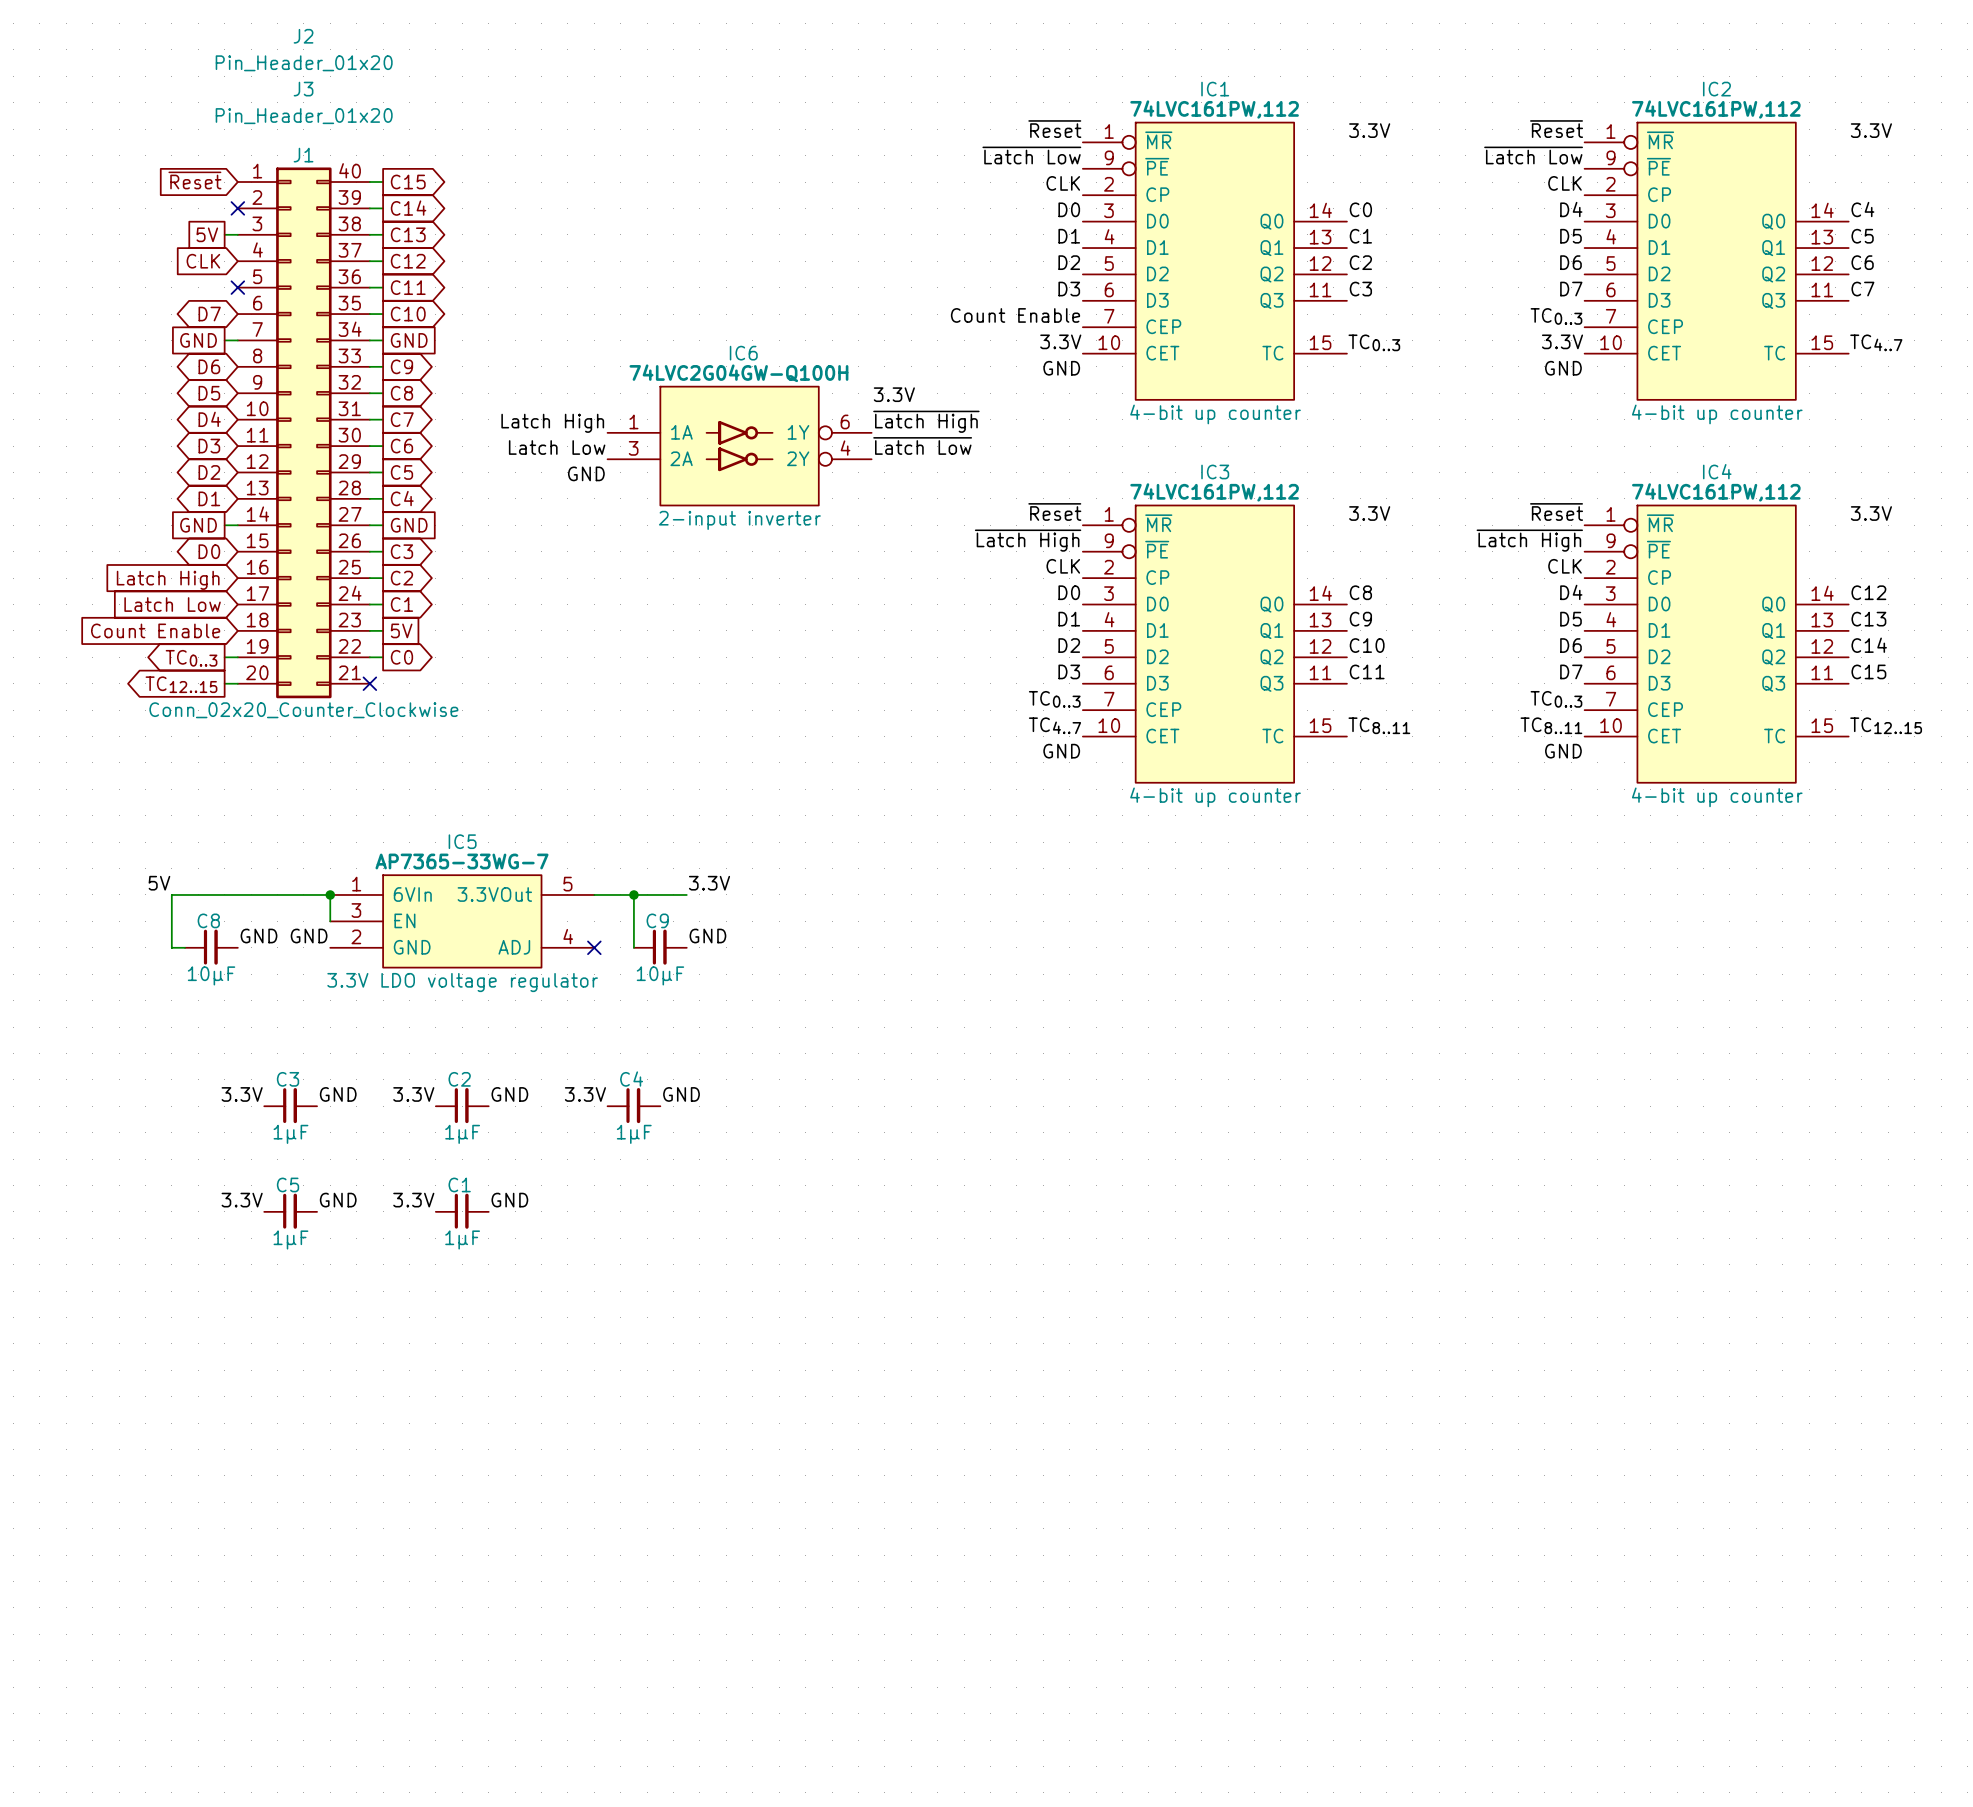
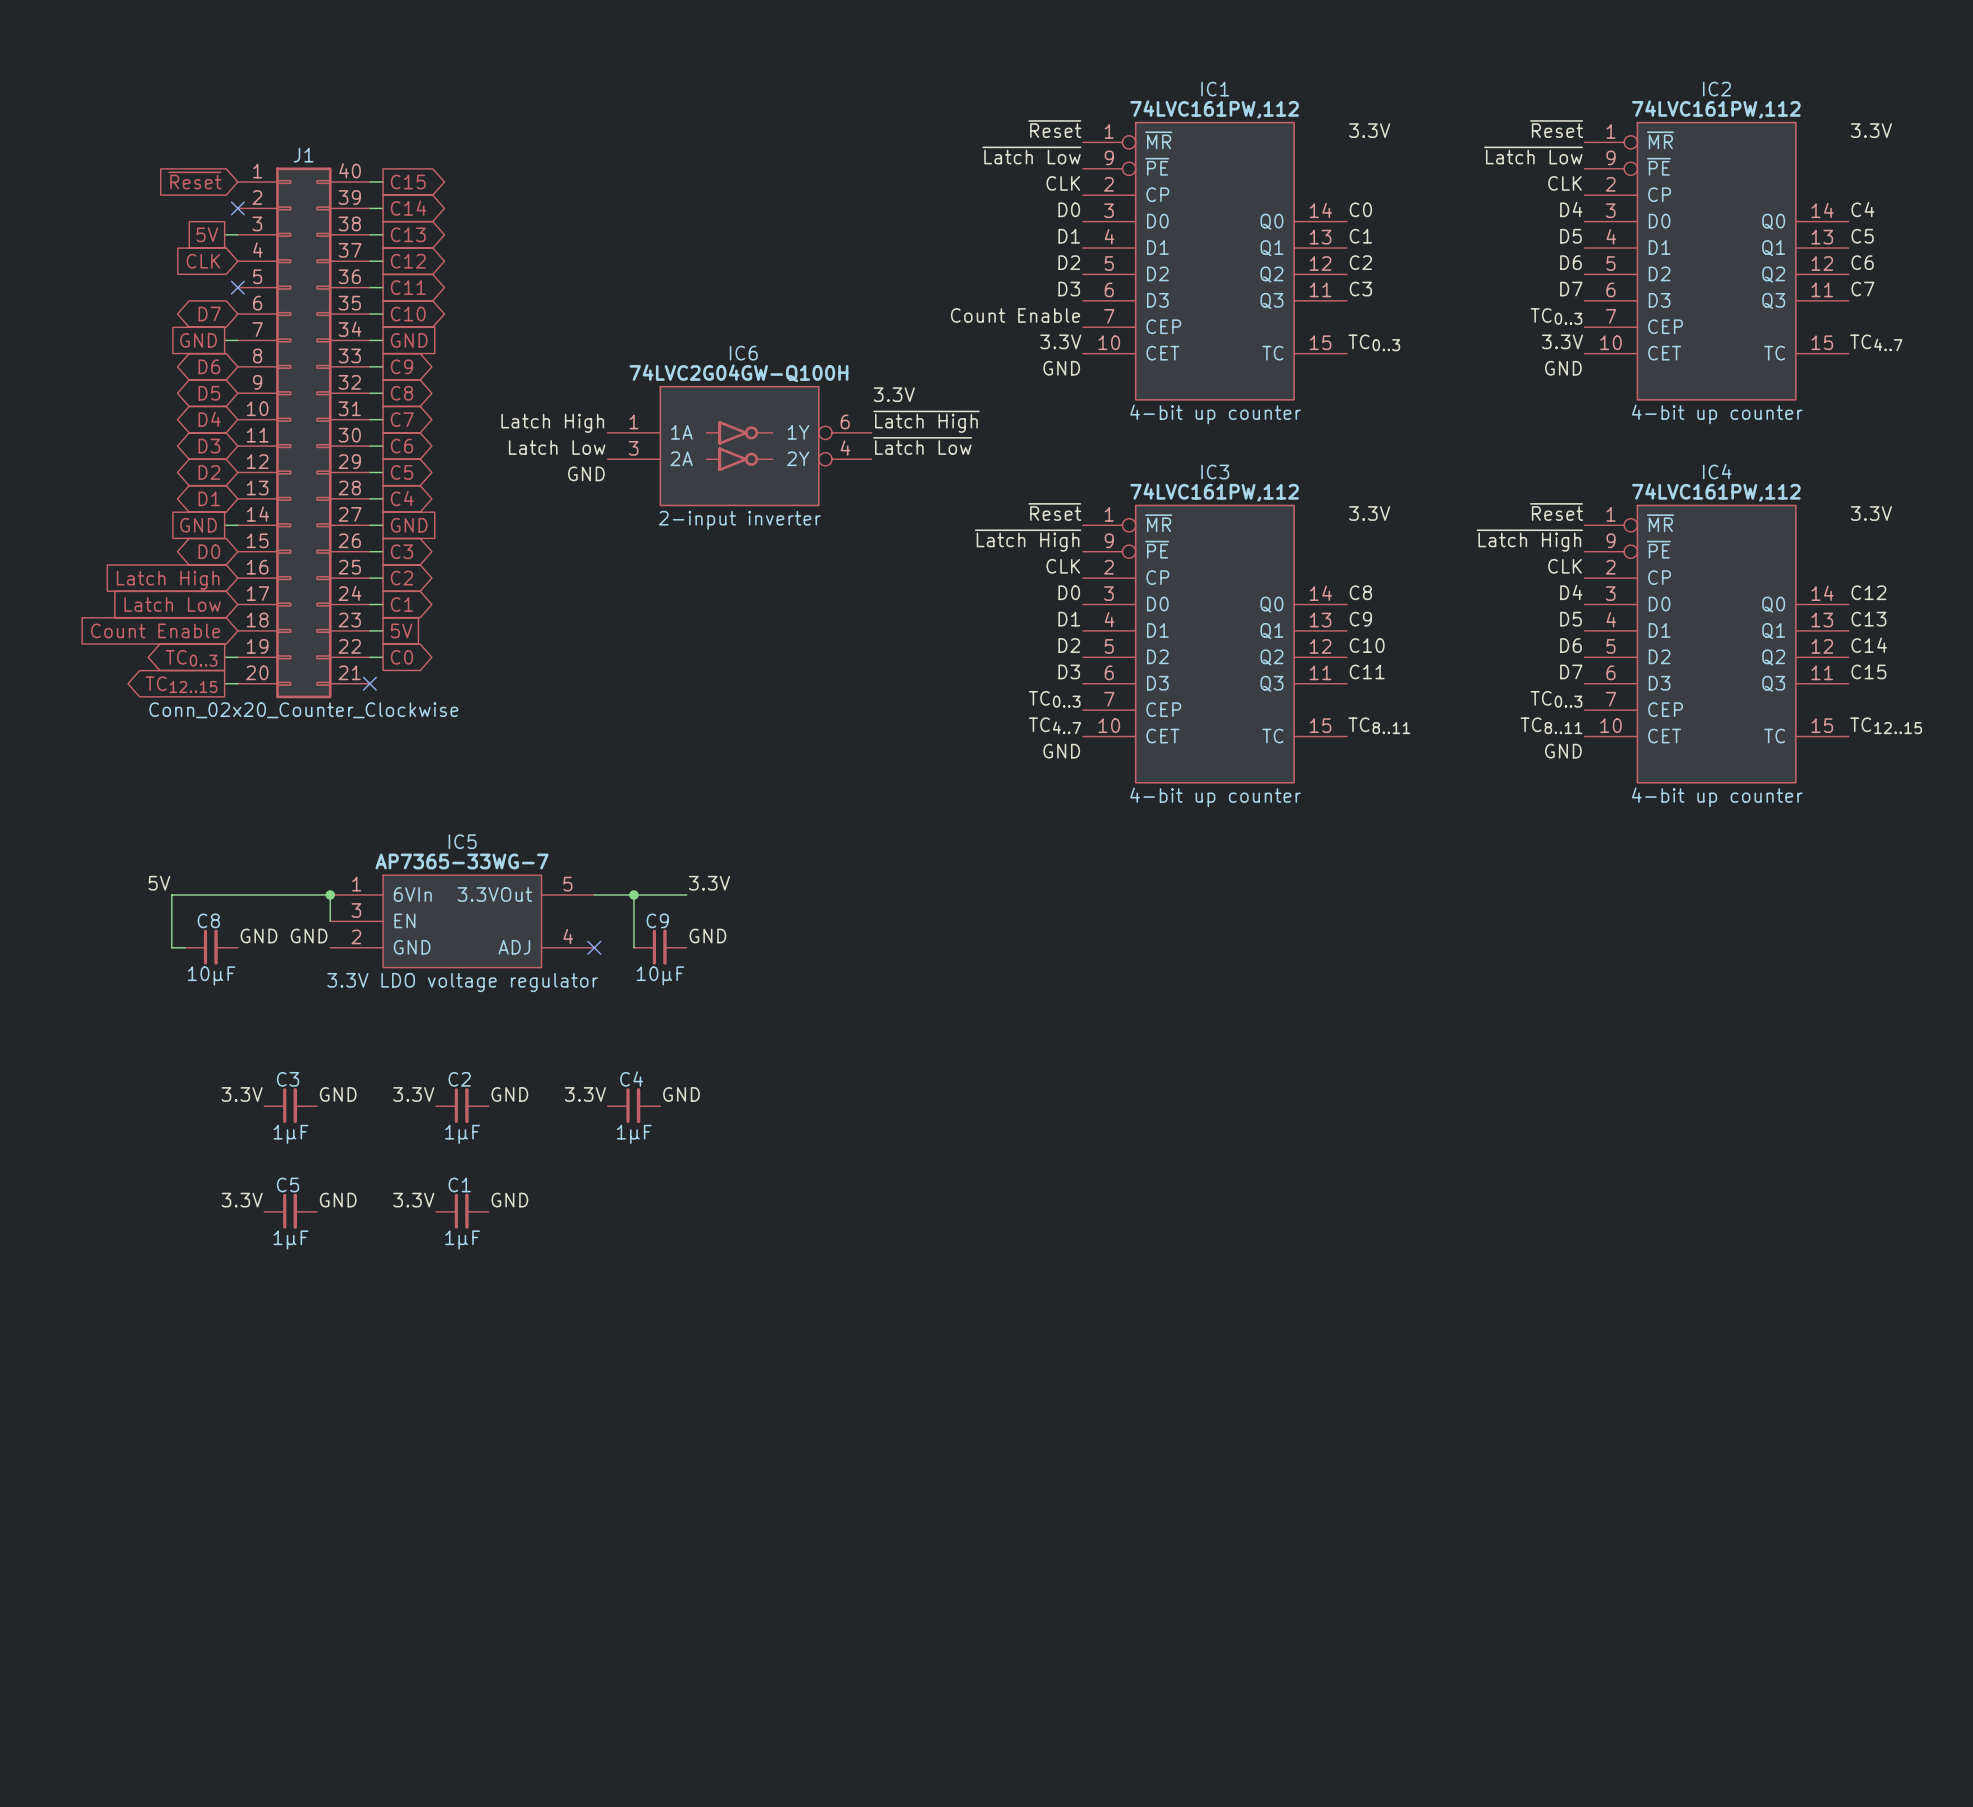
J2: Pin_Header_01x20 (304, 50) -> none
J3: Pin_Header_01x20 (304, 102) -> none

